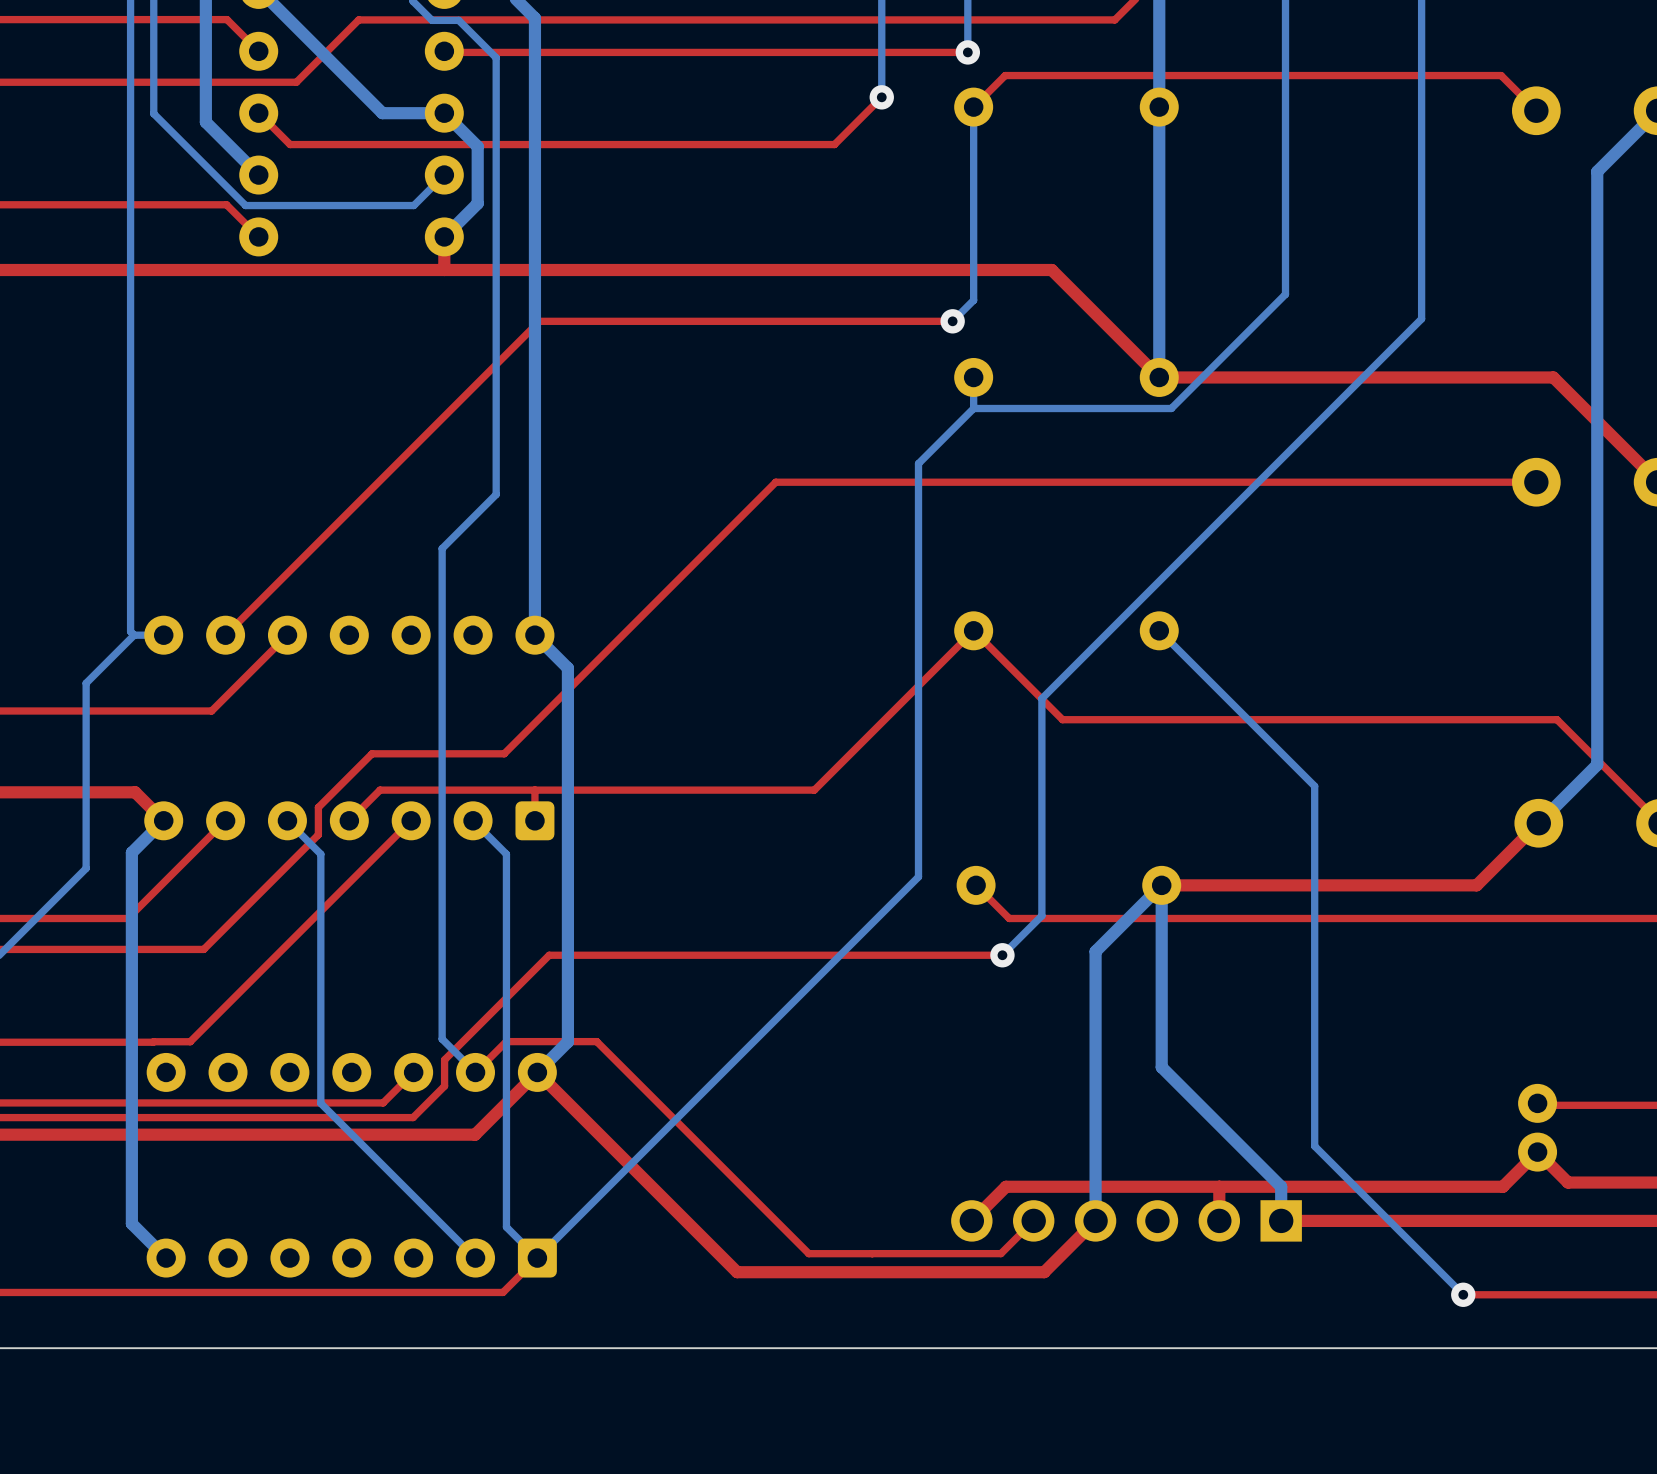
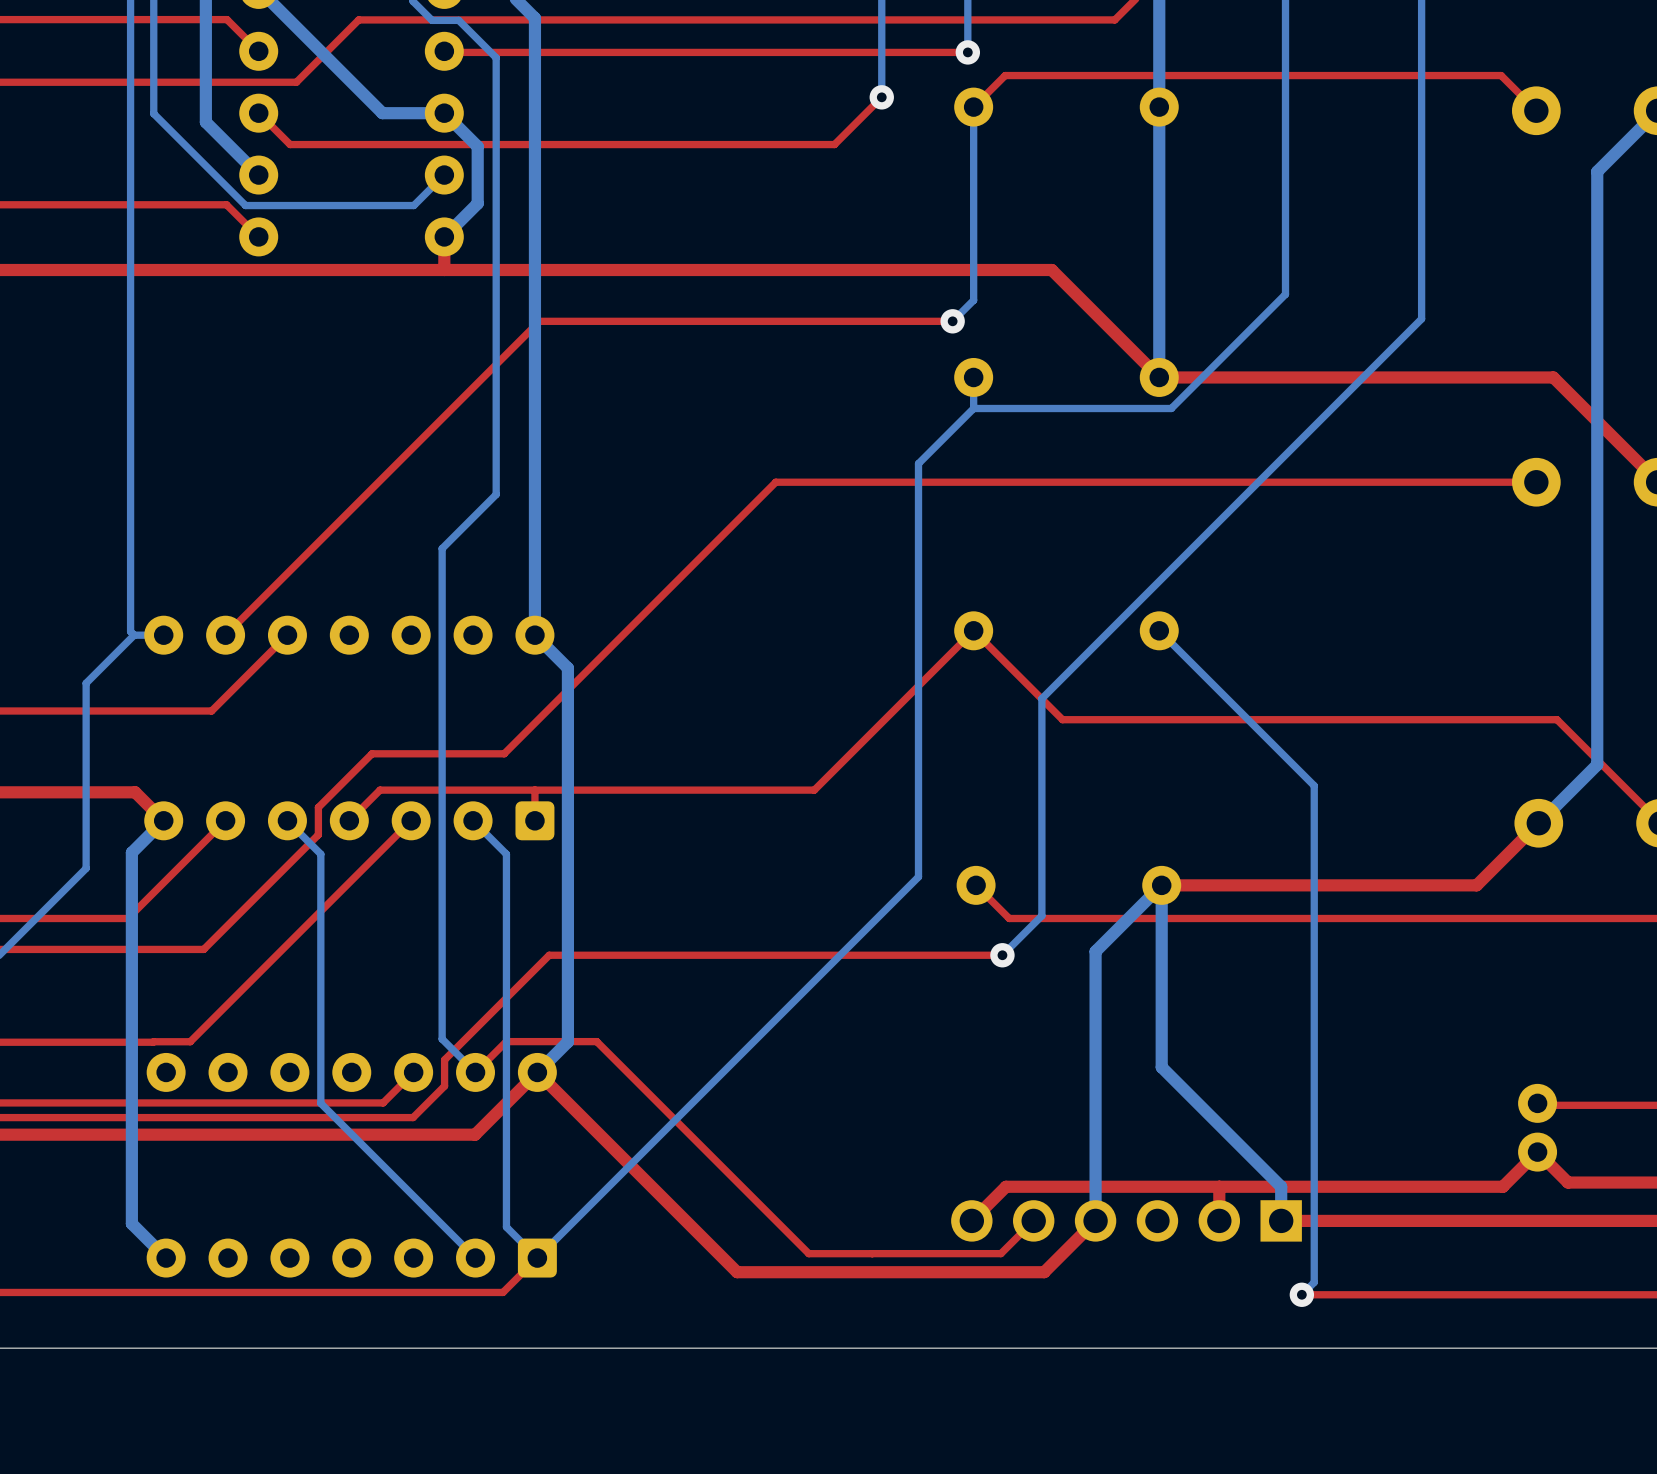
bottom track: (1314, 785) (1314, 1146) (1463, 1294) -> (1314, 785) (1314, 1282) (1301, 1294)
via: none -> (1301, 1294)
top track: none -> (1463, 1294) (1301, 1294)
via: (1463, 1294) -> none

